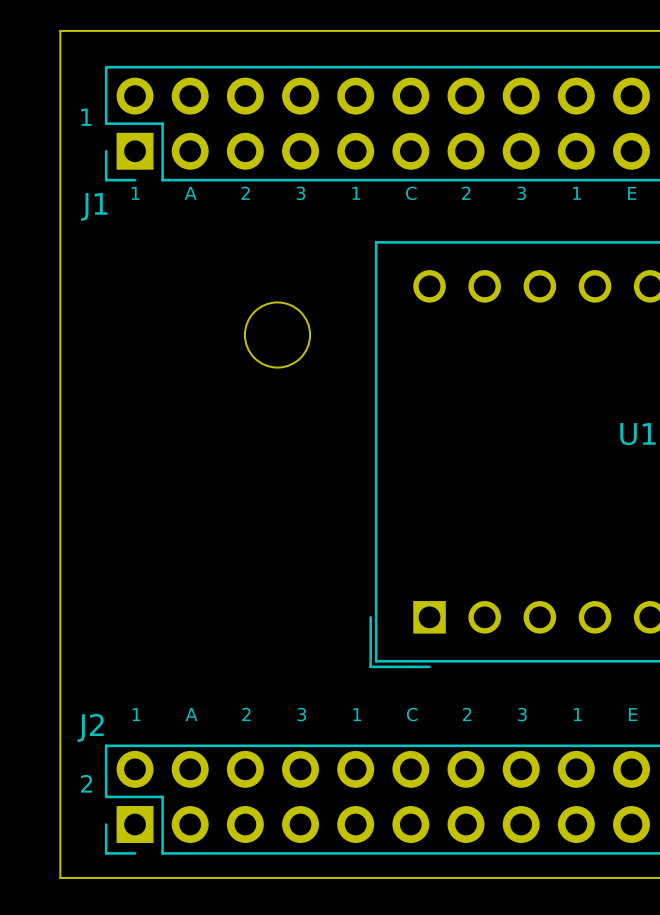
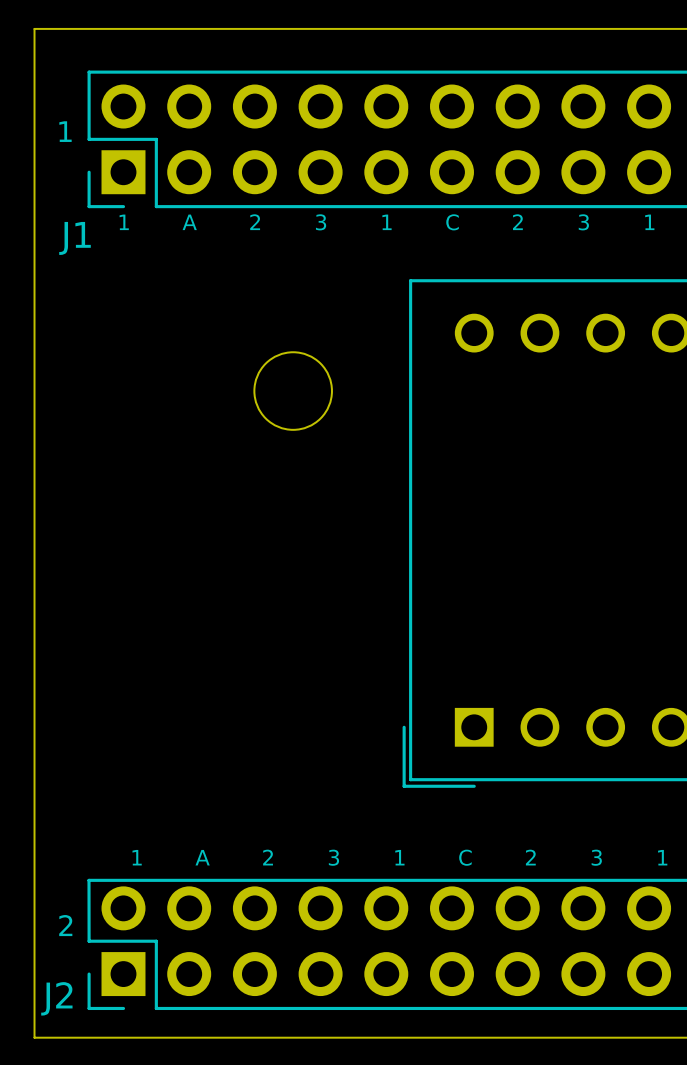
text position: 1 (136, 714) -> 1 (137, 857)
text position: A (191, 714) -> A (202, 857)
text position: 2 (246, 714) -> 2 (268, 857)
text position: 3 (301, 714) -> 3 (333, 857)
text position: 1 (357, 714) -> 1 (399, 857)
text position: C (412, 714) -> C (465, 857)
text position: 2 (467, 714) -> 2 (530, 857)
text position: 3 (522, 714) -> 3 (596, 857)
text position: 1 (577, 714) -> 1 (662, 857)
J2 name position: J2 (90, 727) -> J2 (56, 998)

